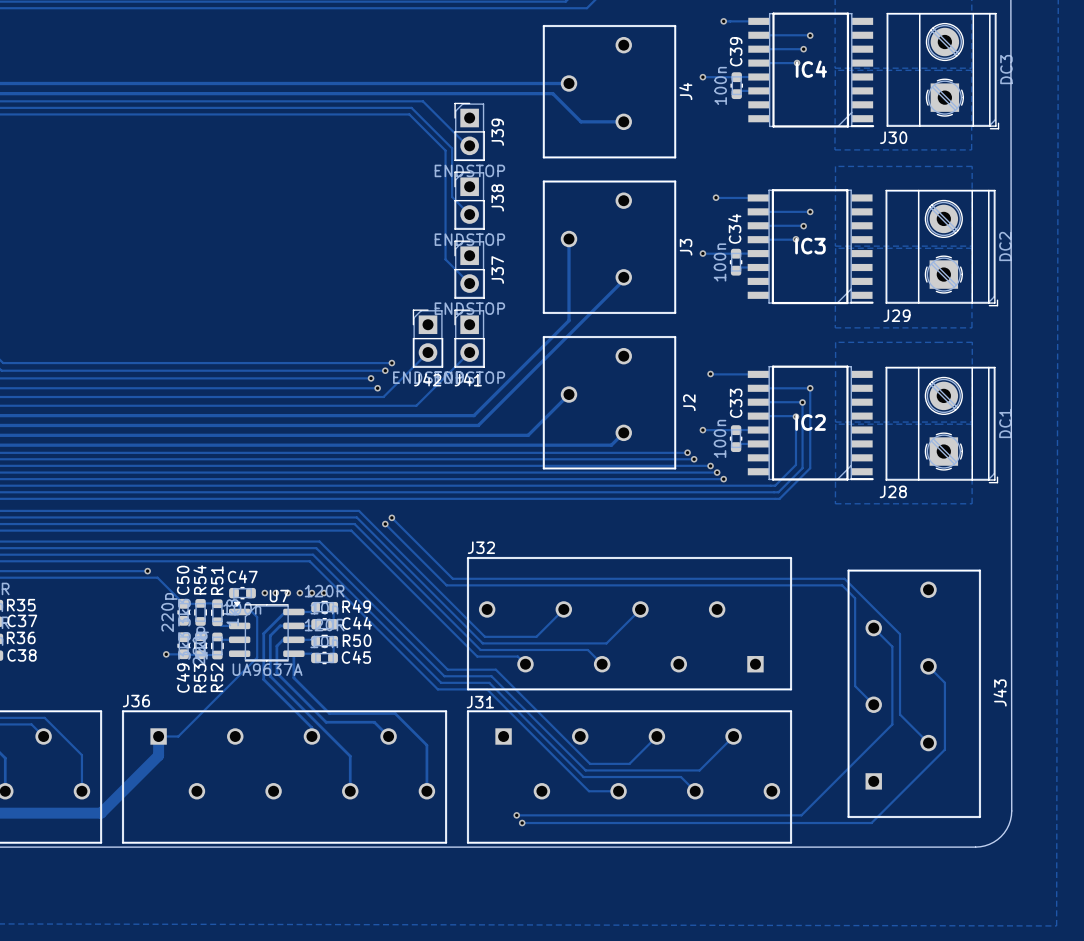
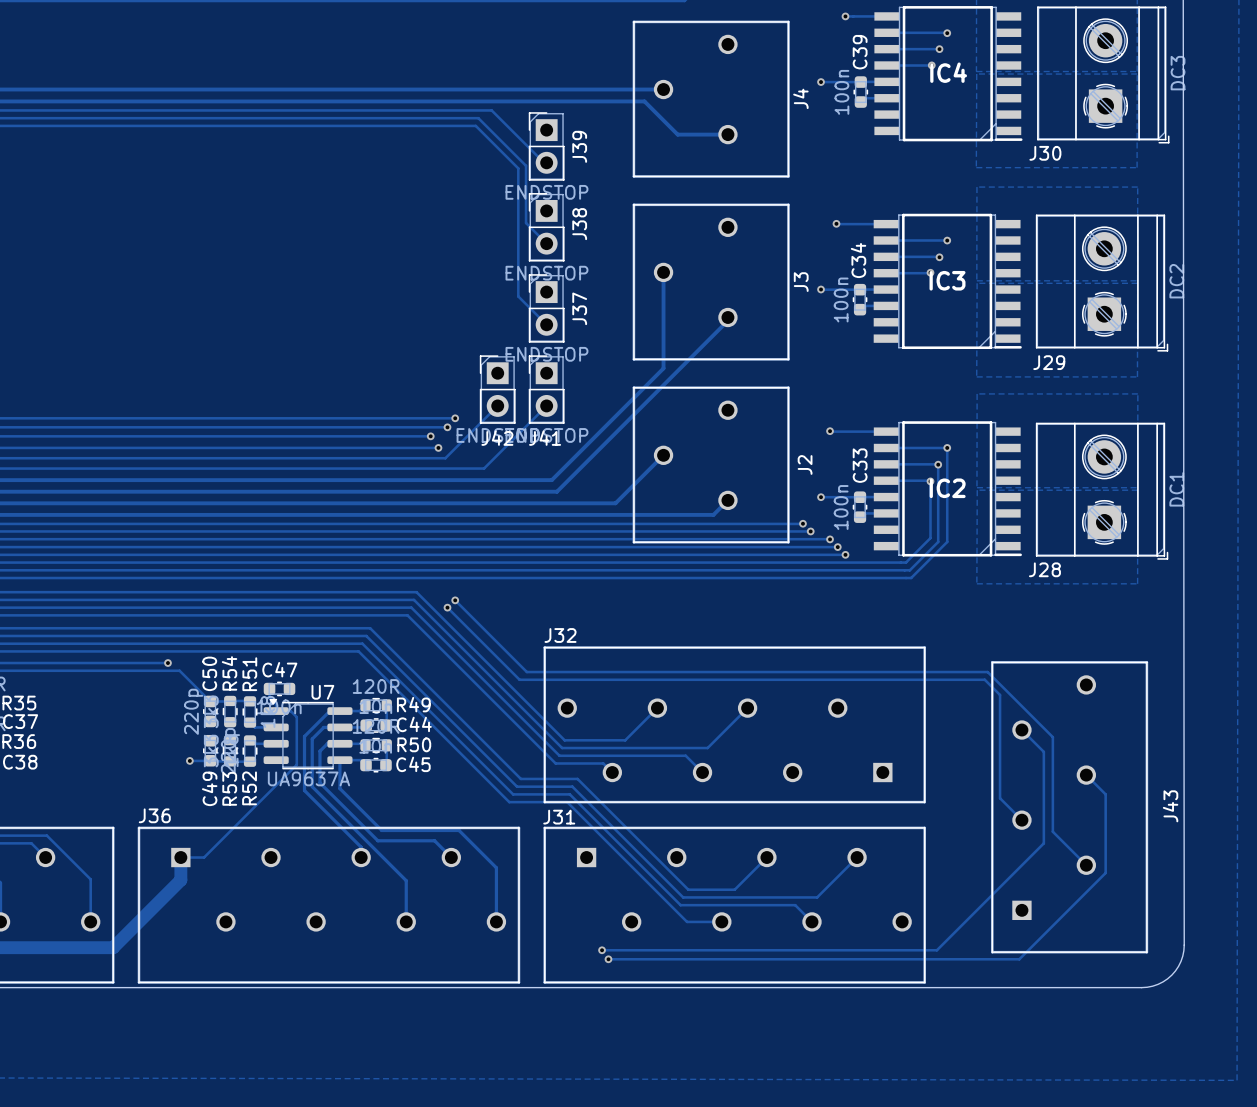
via: (264, 593) -> none
via: (275, 593) -> none
via: (287, 593) -> none
via: (299, 593) -> none
via: (311, 593) -> none
via: (323, 593) -> none

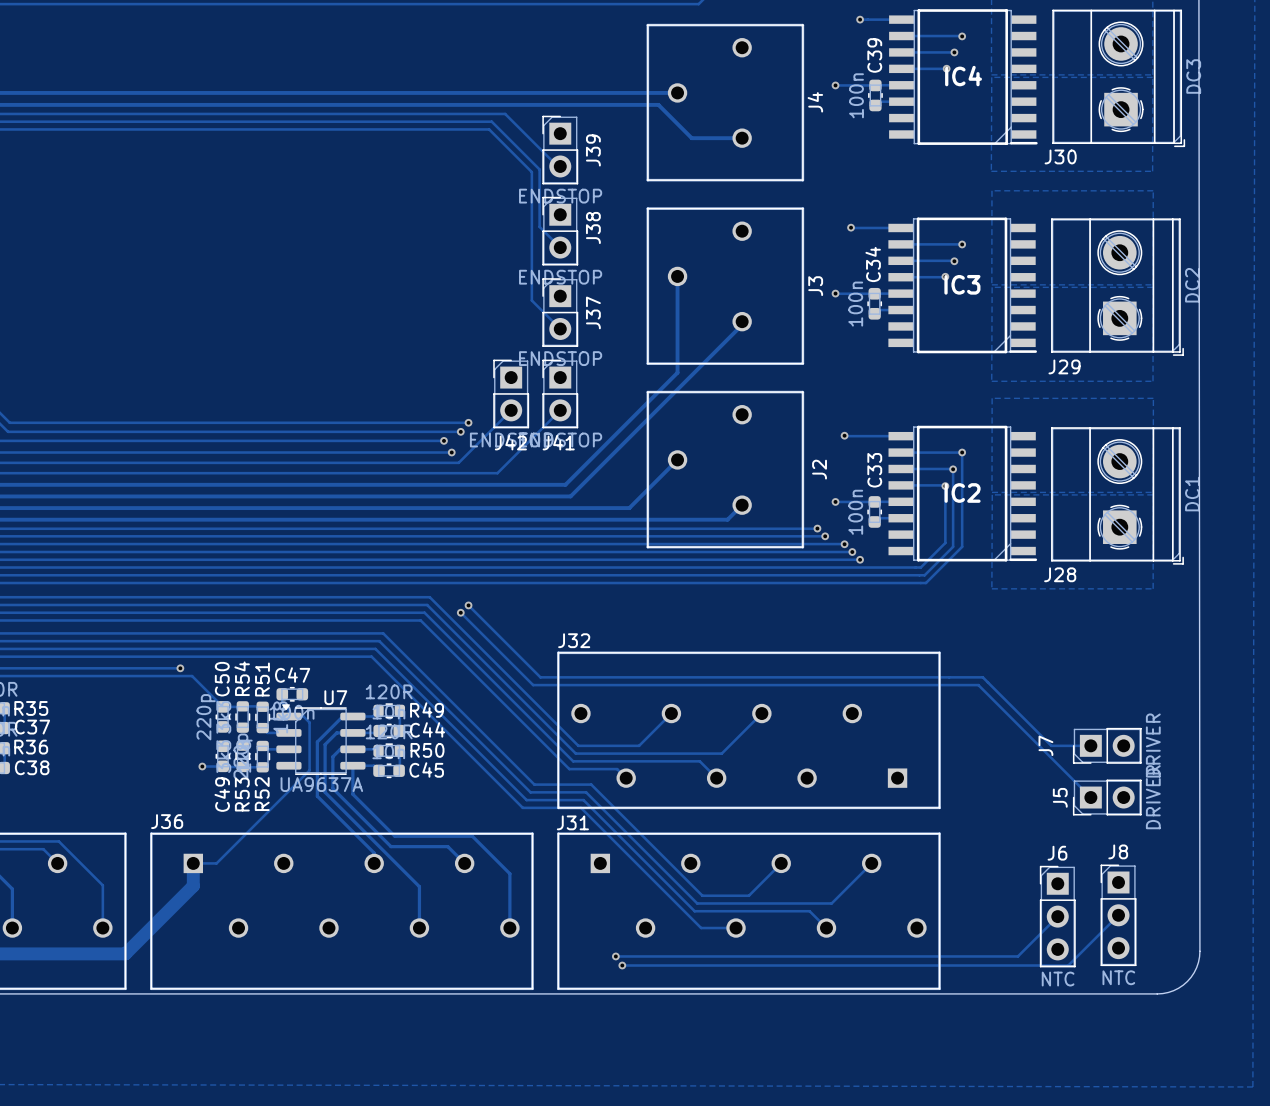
track: (967, 672) (987, 672) (1052, 737) (1052, 831) (1086, 865) -> (982, 677) (1051, 745) (1090, 745)
track: (963, 679) (984, 679) (1000, 695) (1000, 798) (1021, 820) -> (978, 685) (1090, 797)
track: (1021, 730) (1043, 751) (1043, 843) (936, 950) -> (1057, 916) (1017, 956) (951, 956)
J7: none -> DRIVER (1107, 745)
track: (1086, 775) (1105, 794) (1105, 872) (1019, 959) -> (1118, 915) (1068, 965) (1034, 965)
J5: none -> DRIVER (1107, 797)
J43: (1069, 807) -> none
J8: none -> NTC (1118, 915)
J6: none -> NTC (1057, 916)

